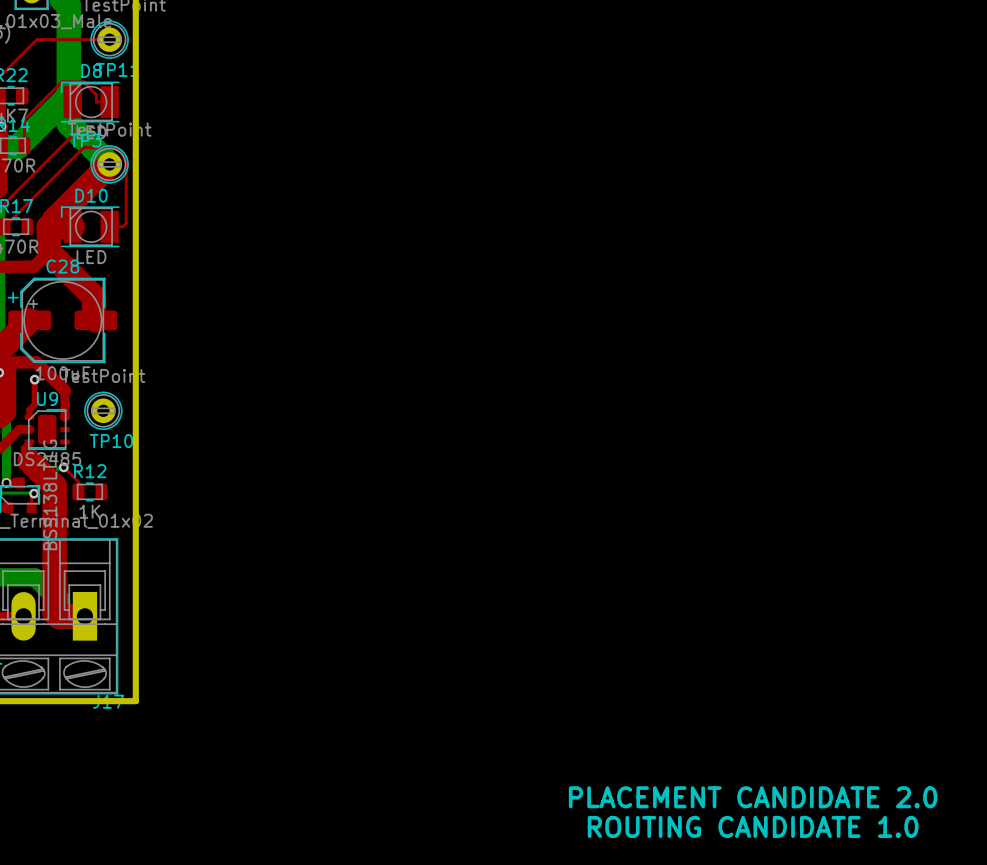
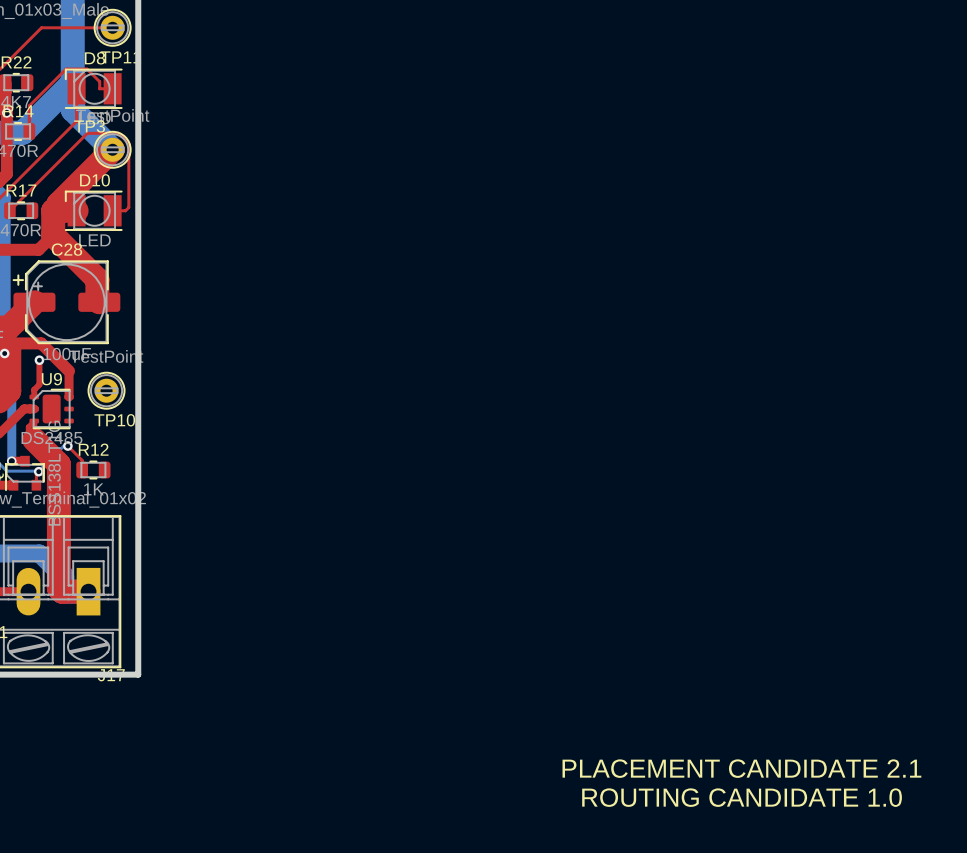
text: PLACEMENT CANDIDATE 2.0 (753, 797) -> PLACEMENT CANDIDATE 2.1 (741, 768)

